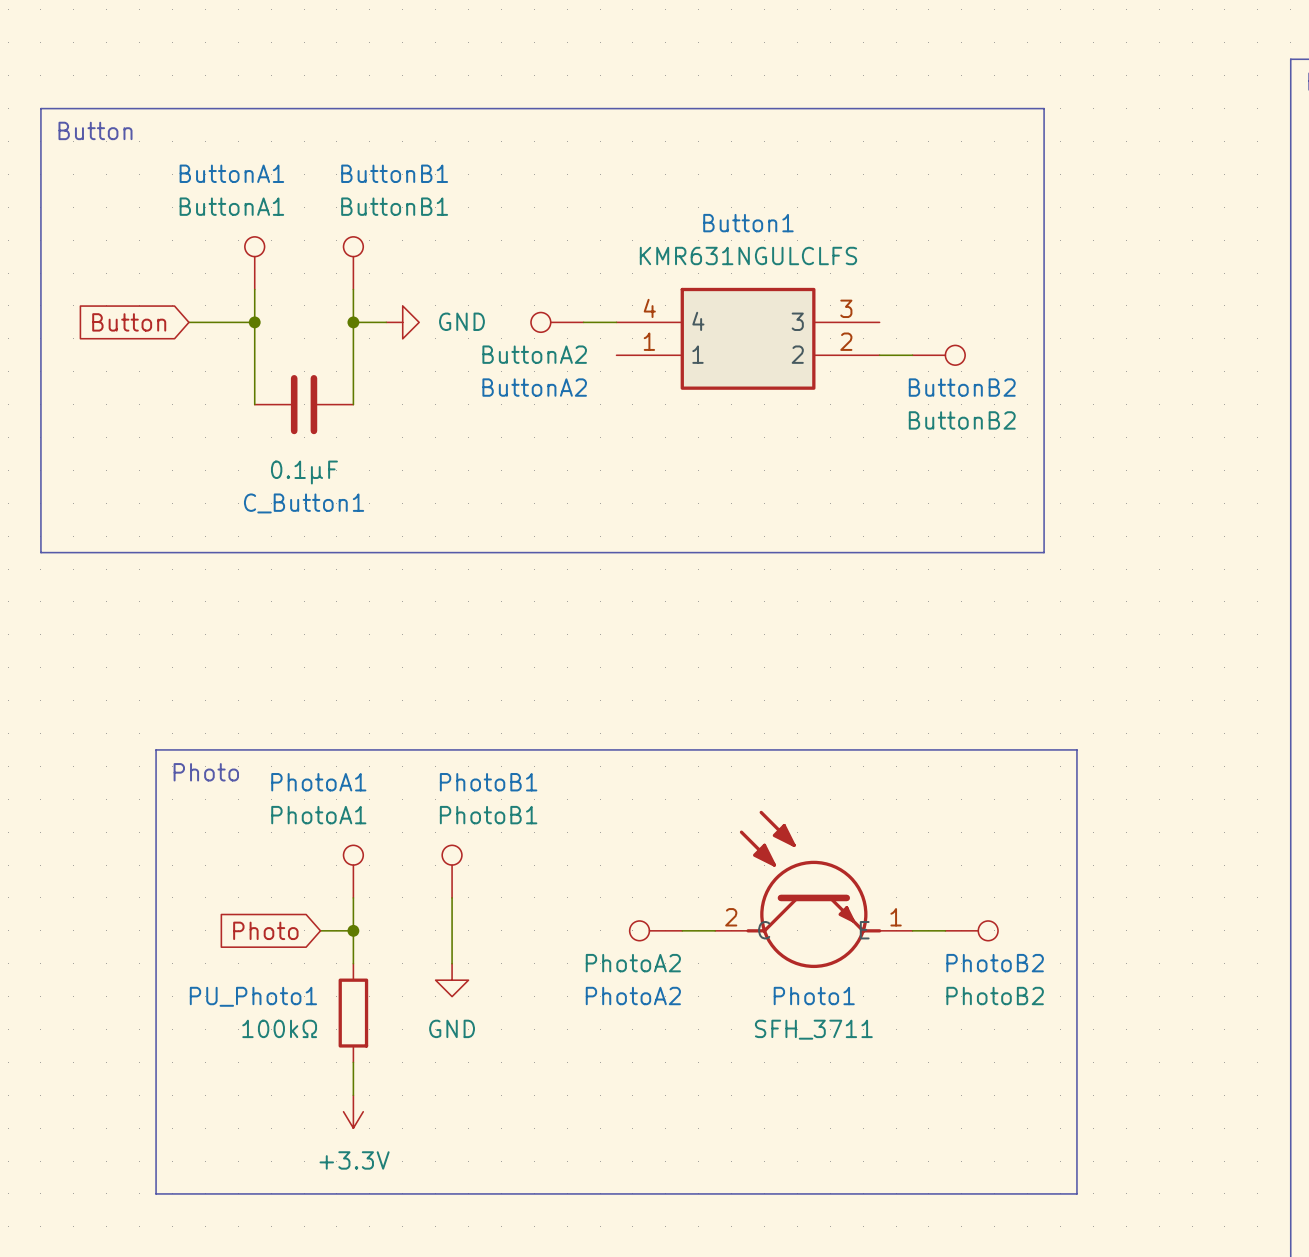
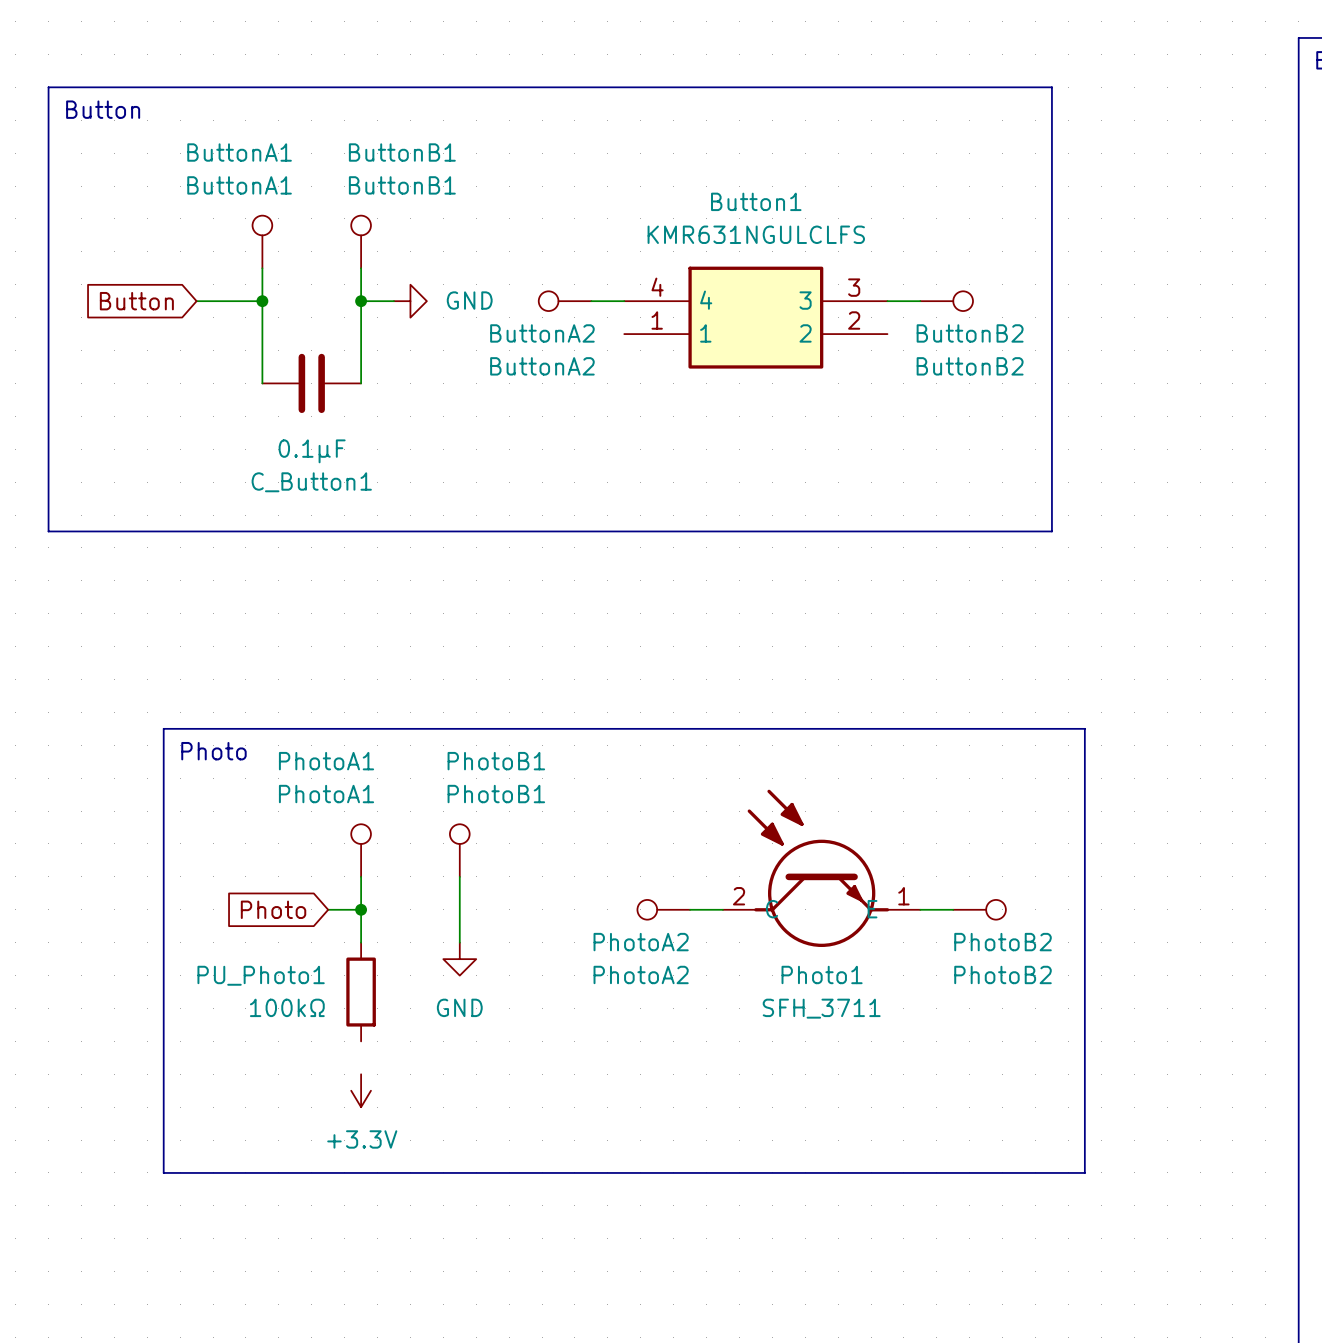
wire: (879, 355) (912, 355) -> (887, 301) (920, 301)
ButtonB2 position: (938, 355) -> (946, 301)
wire: (353, 1062) (353, 1095) -> none

